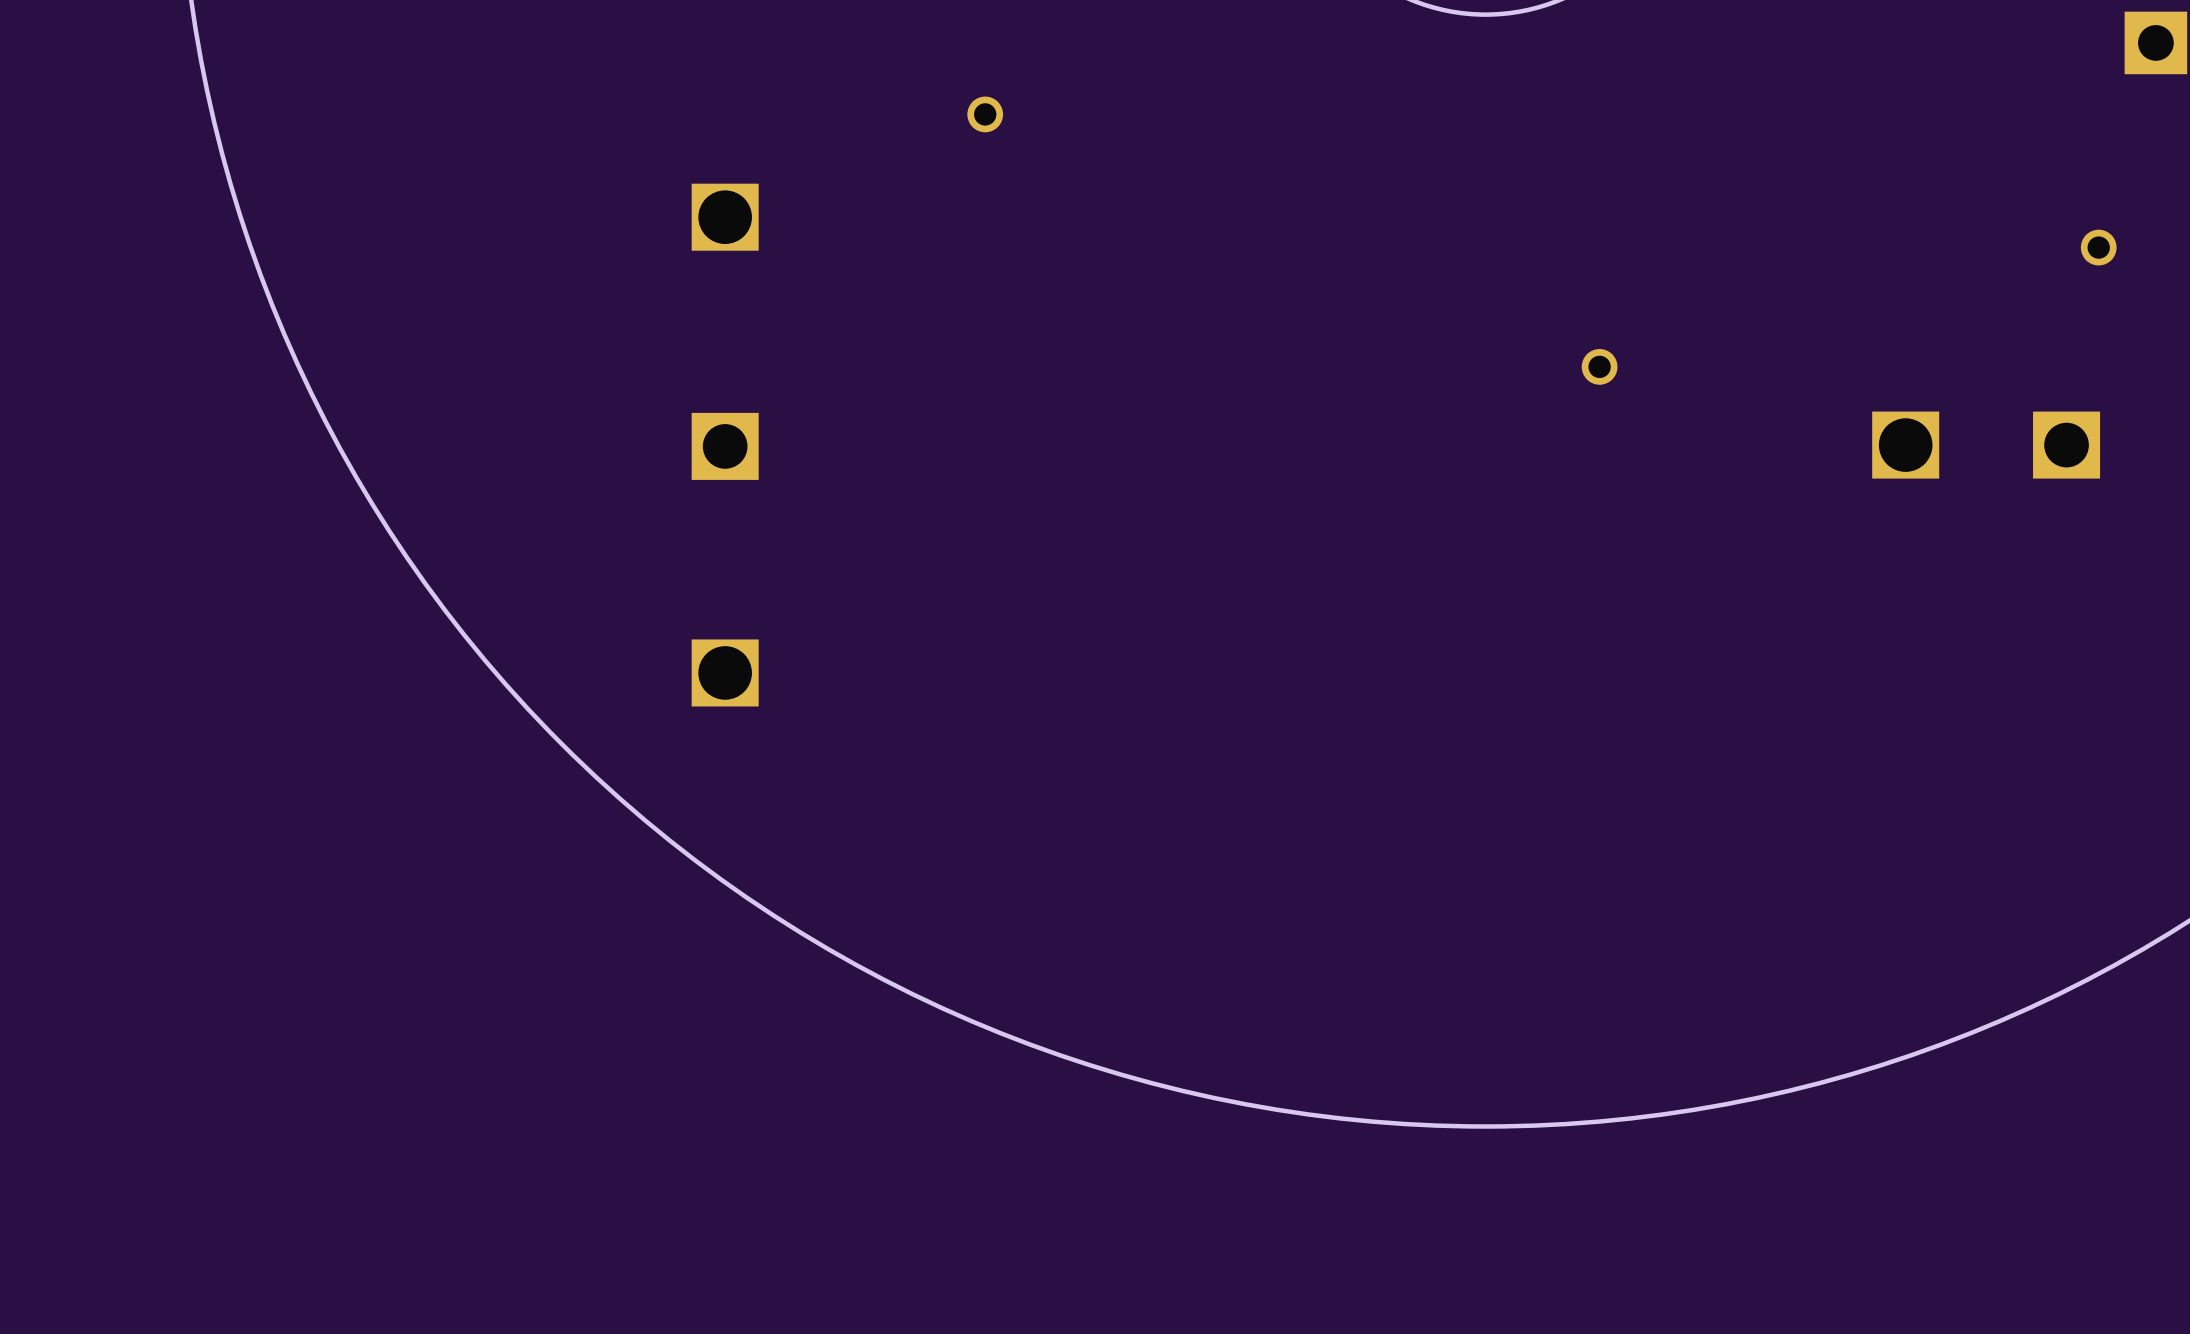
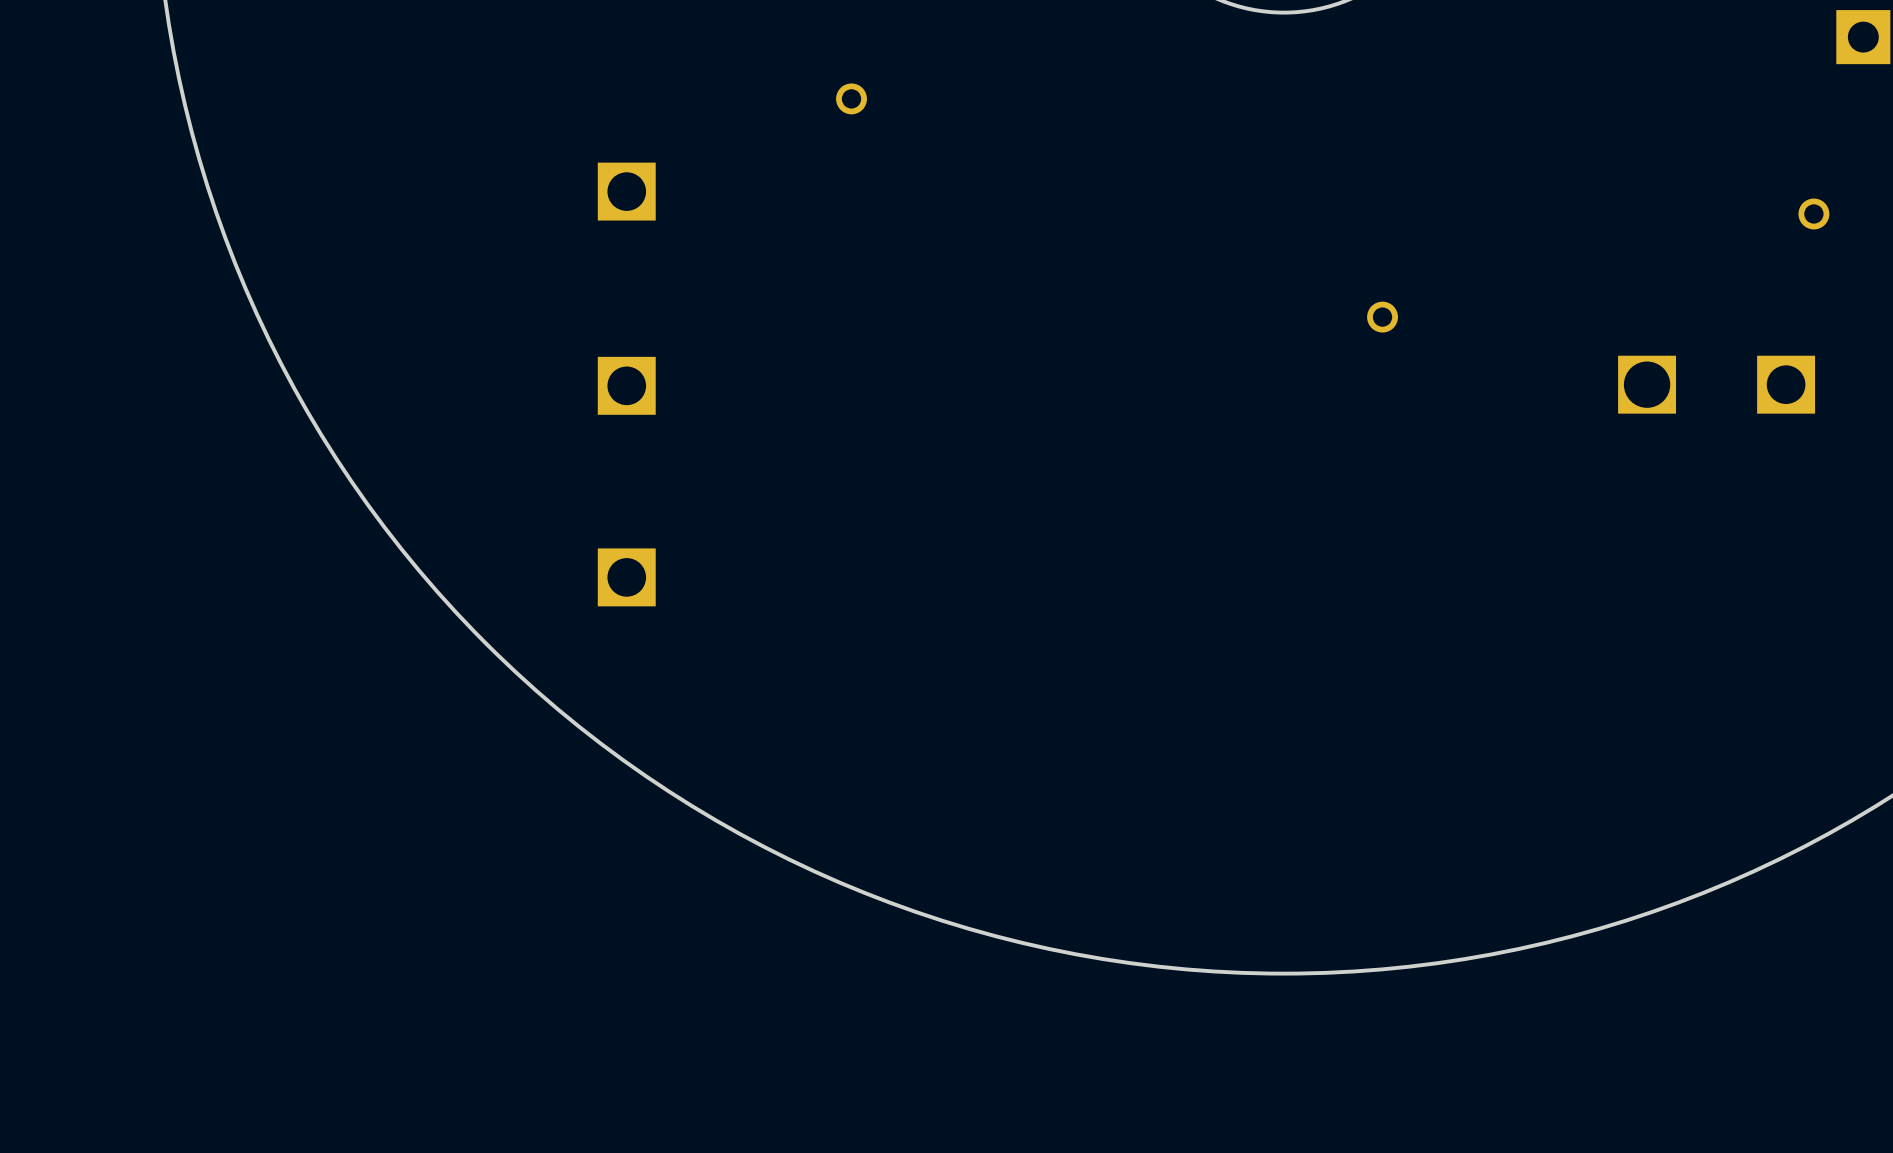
part footprint: [691, 183, 759, 251] -> [597, 162, 656, 221]
part footprint: [691, 639, 759, 707] -> [597, 548, 656, 607]

